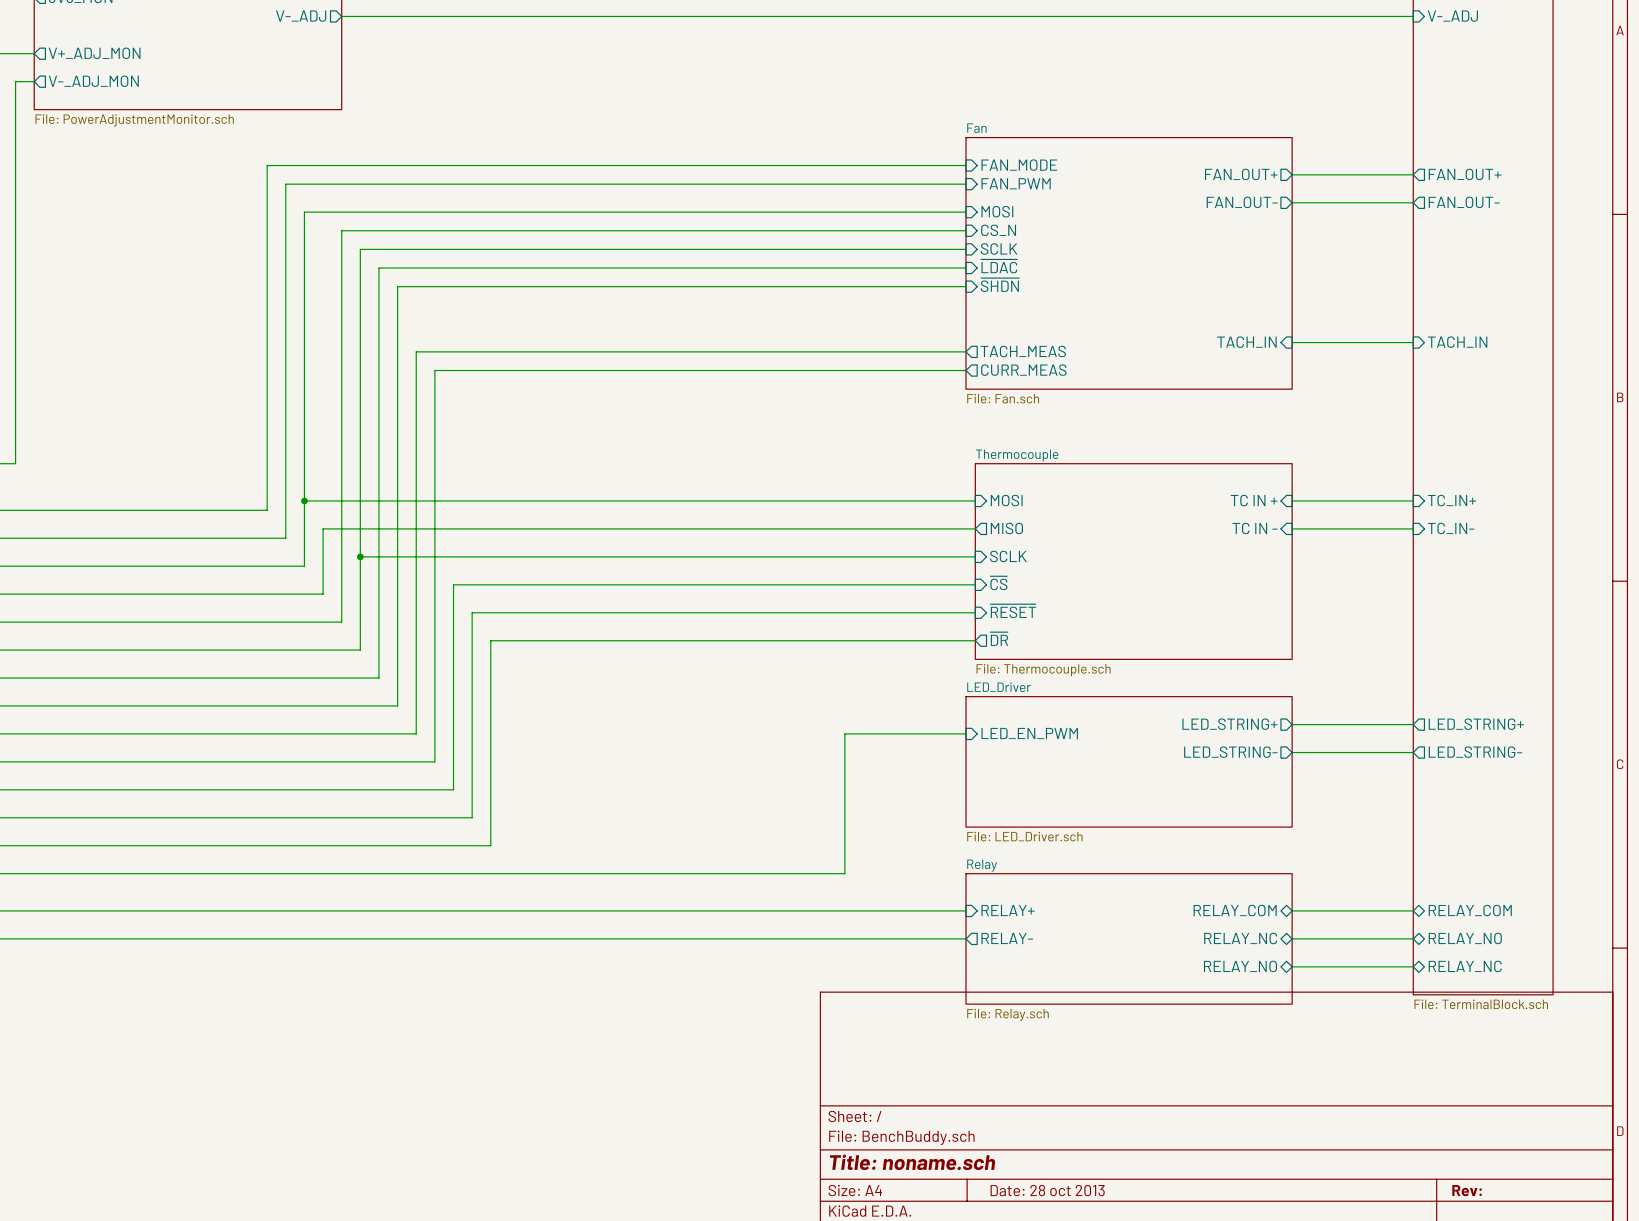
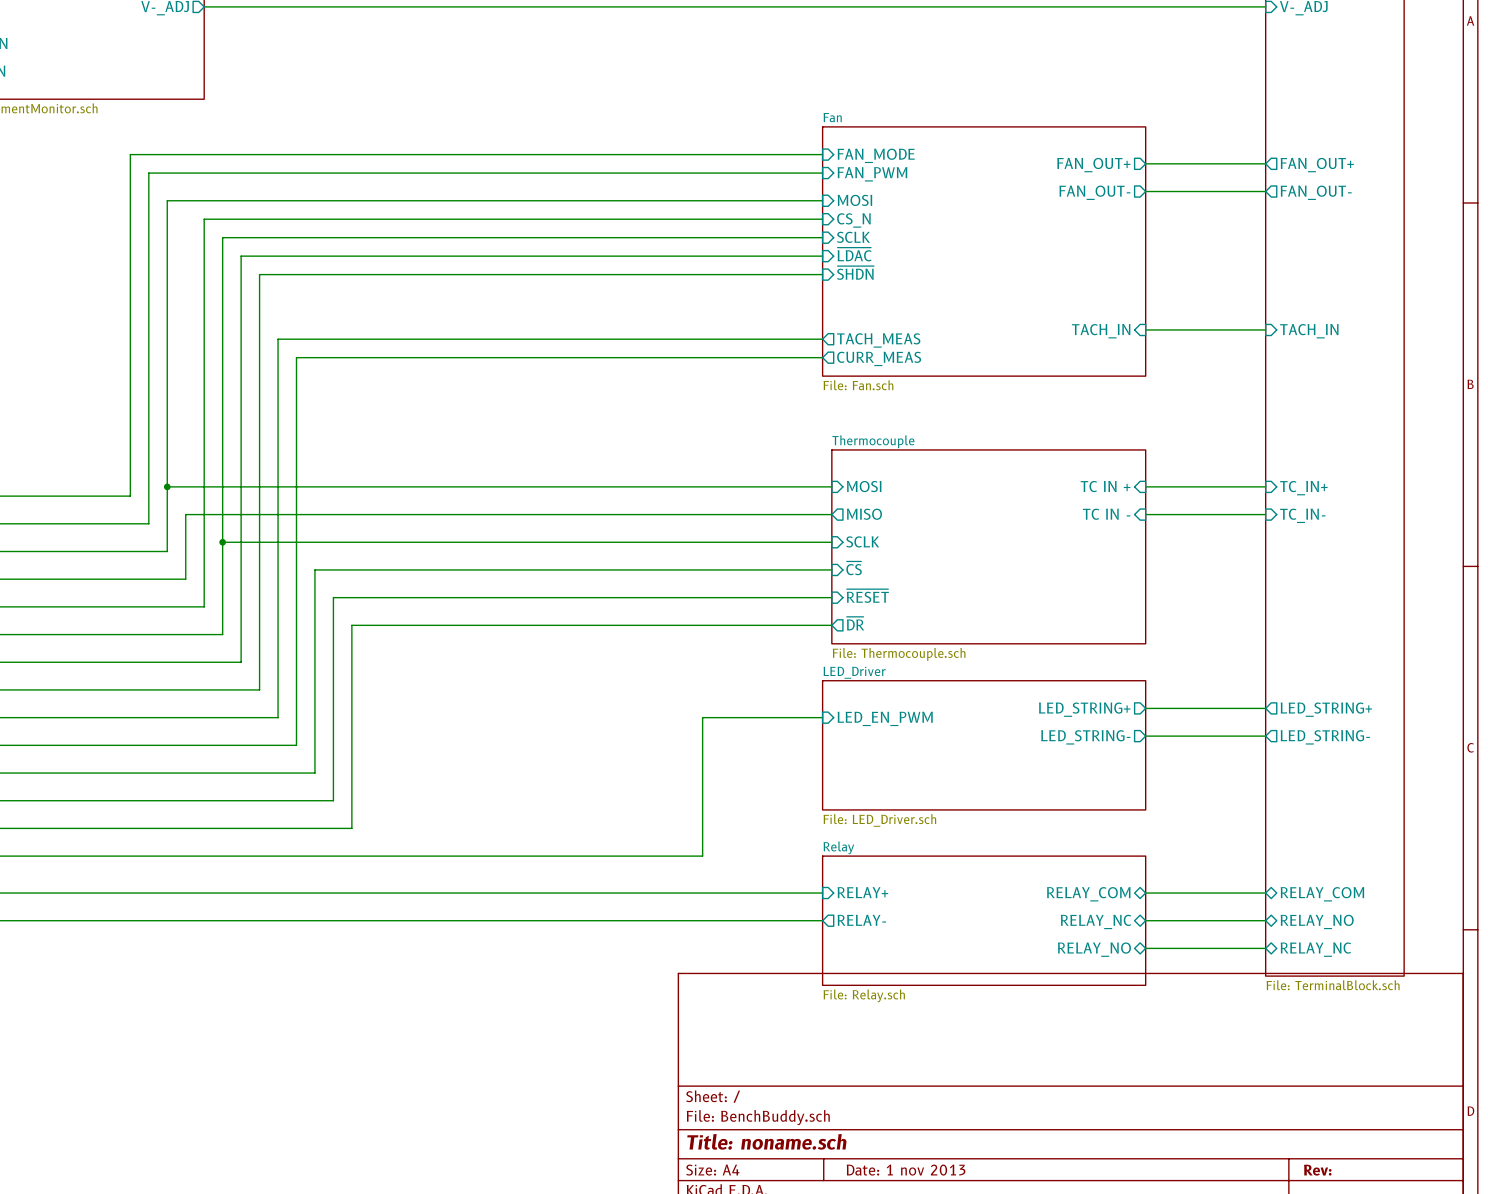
title block: Date: 28 oct 2013 (1047, 1190) -> Date: 1 nov 2013 (906, 1170)

